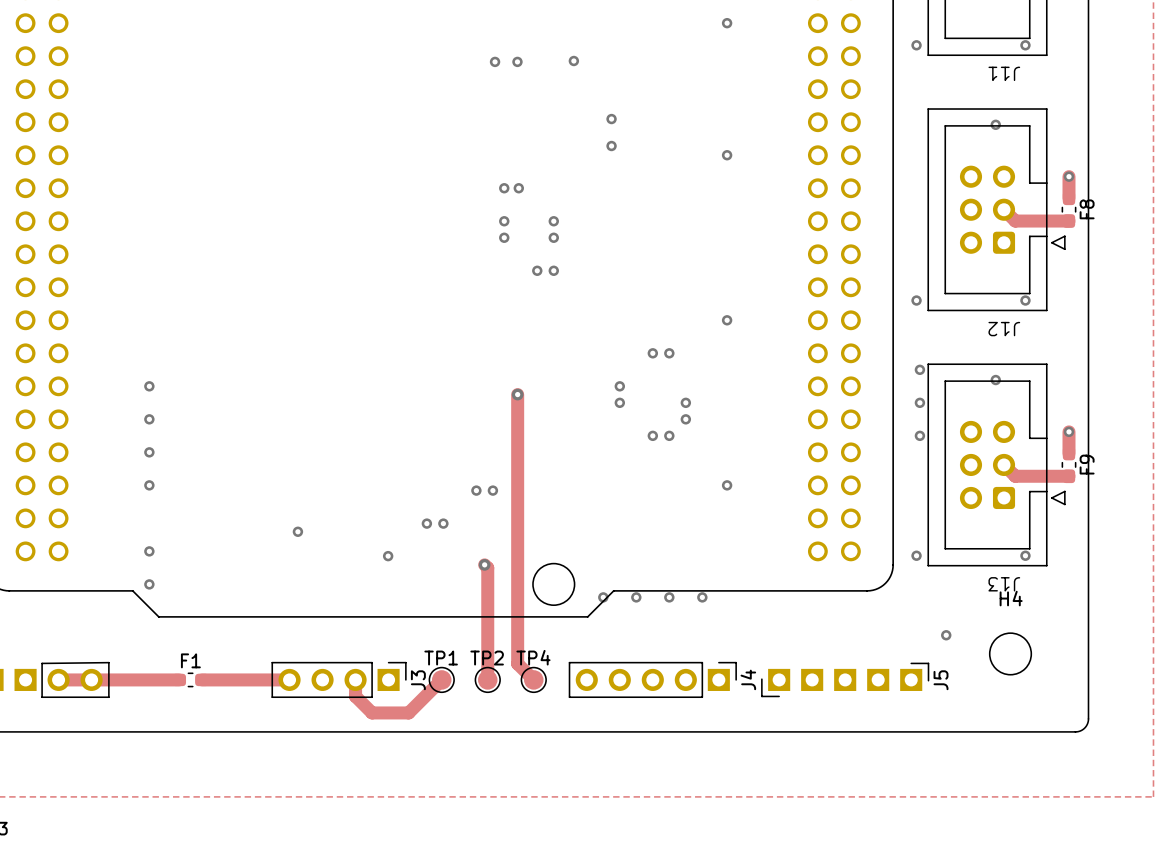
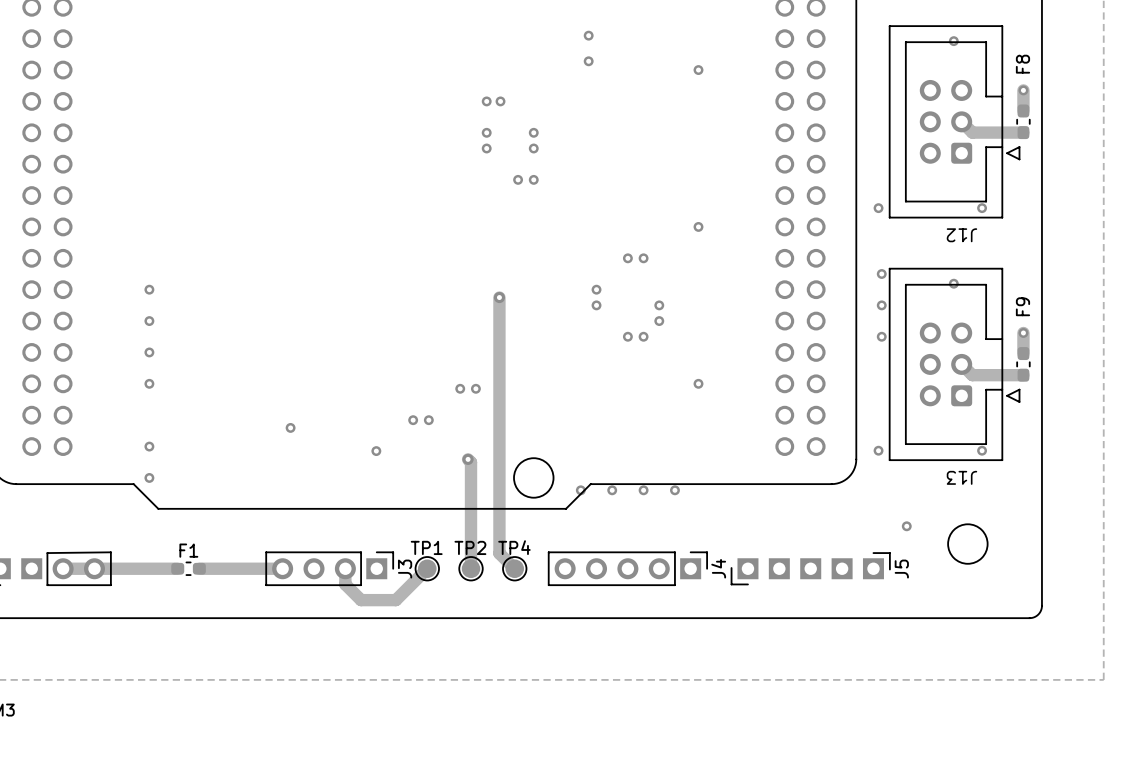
F8 name position: F8 (1087, 209) -> F8 (1022, 64)
F9 name position: F9 (1087, 464) -> F9 (1022, 306)
H4 name: H4 (1011, 598) -> none

